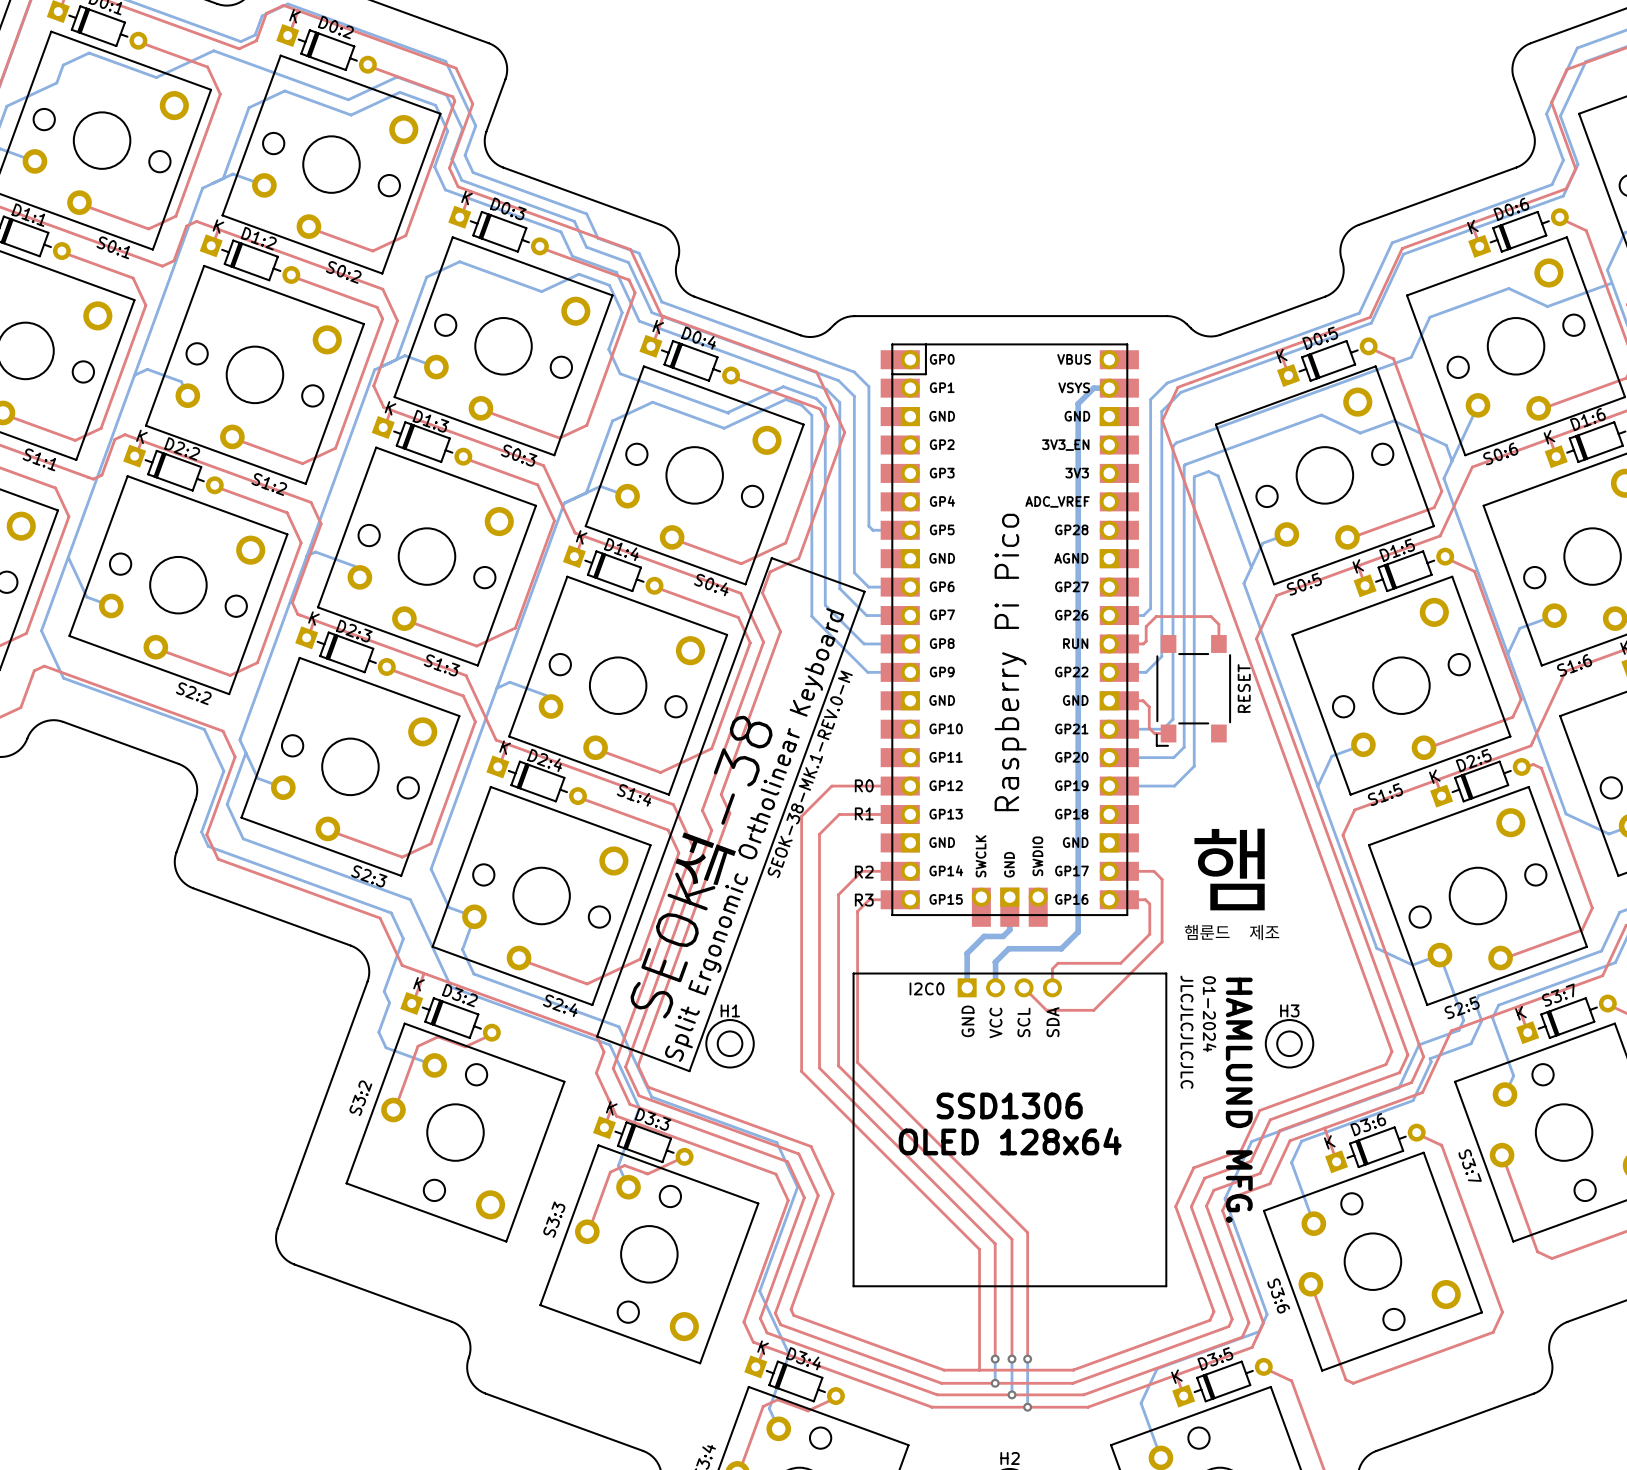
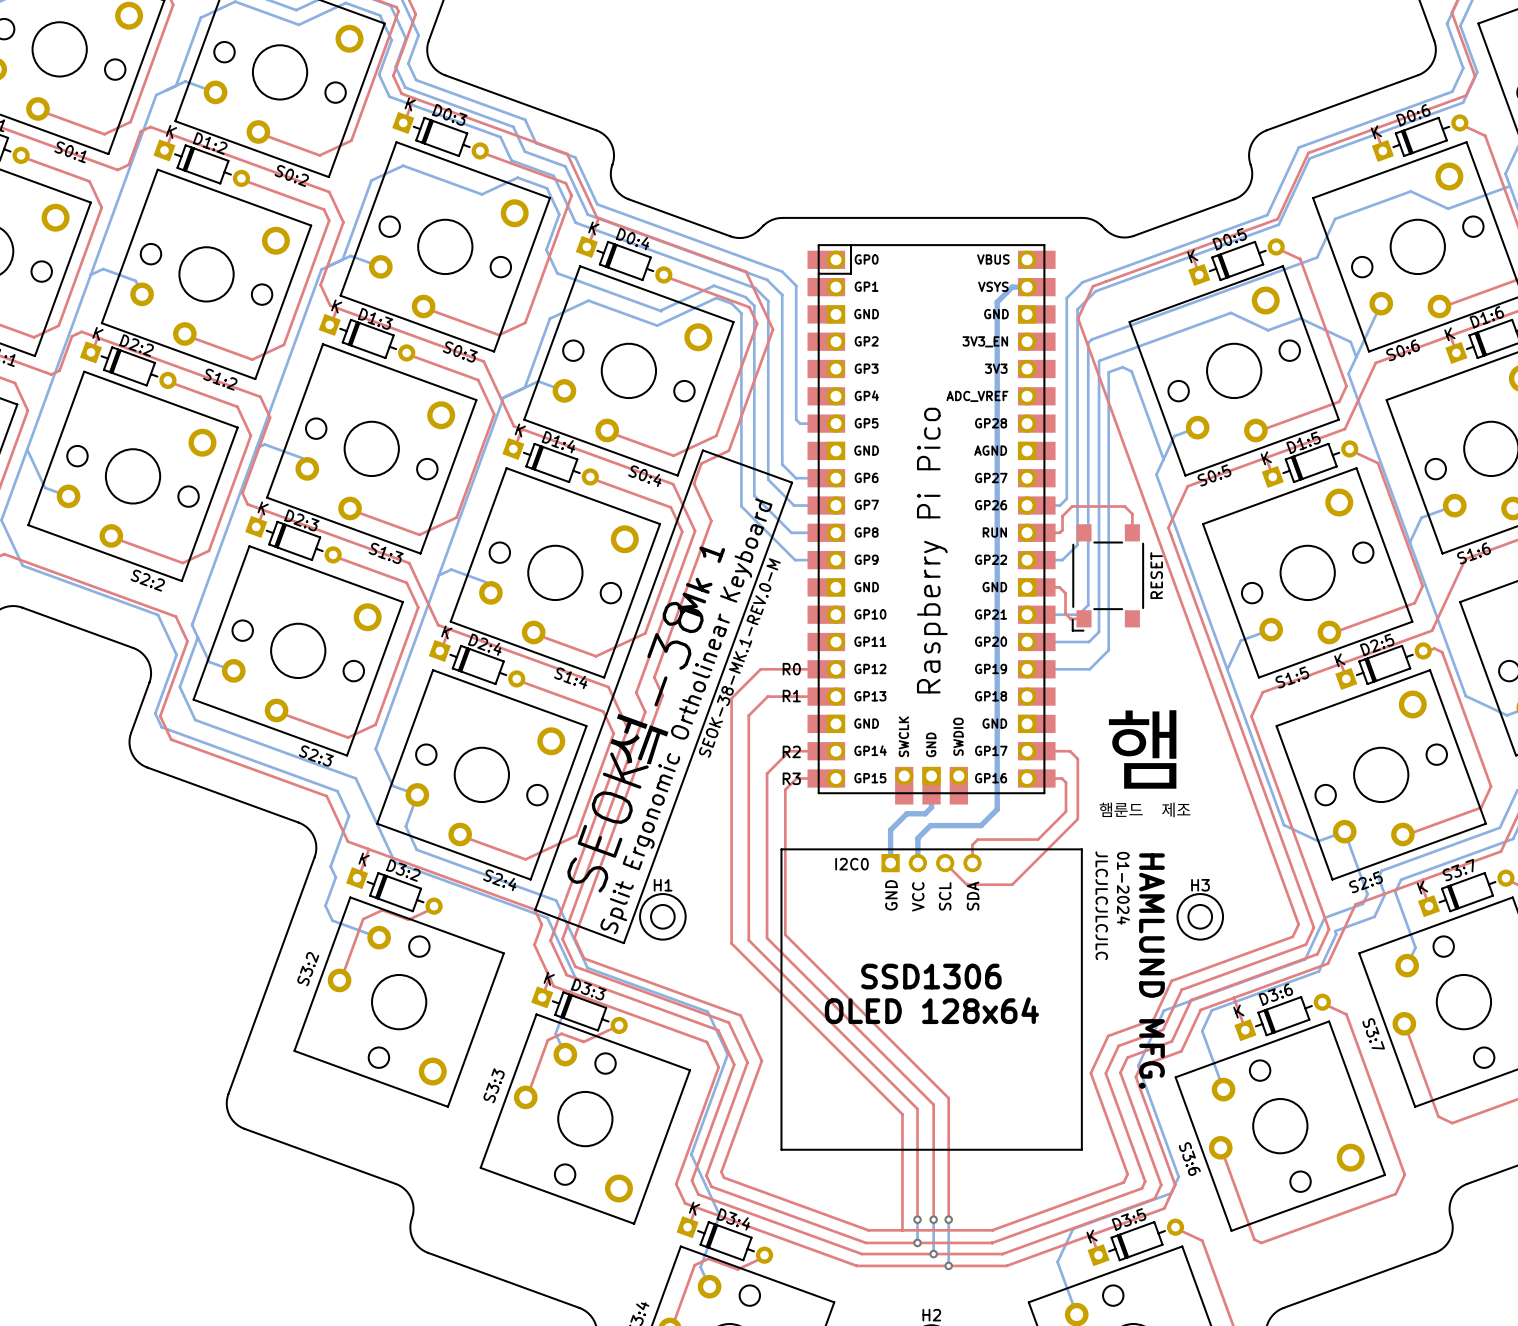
text: none -> Mk 1 (701, 581)

